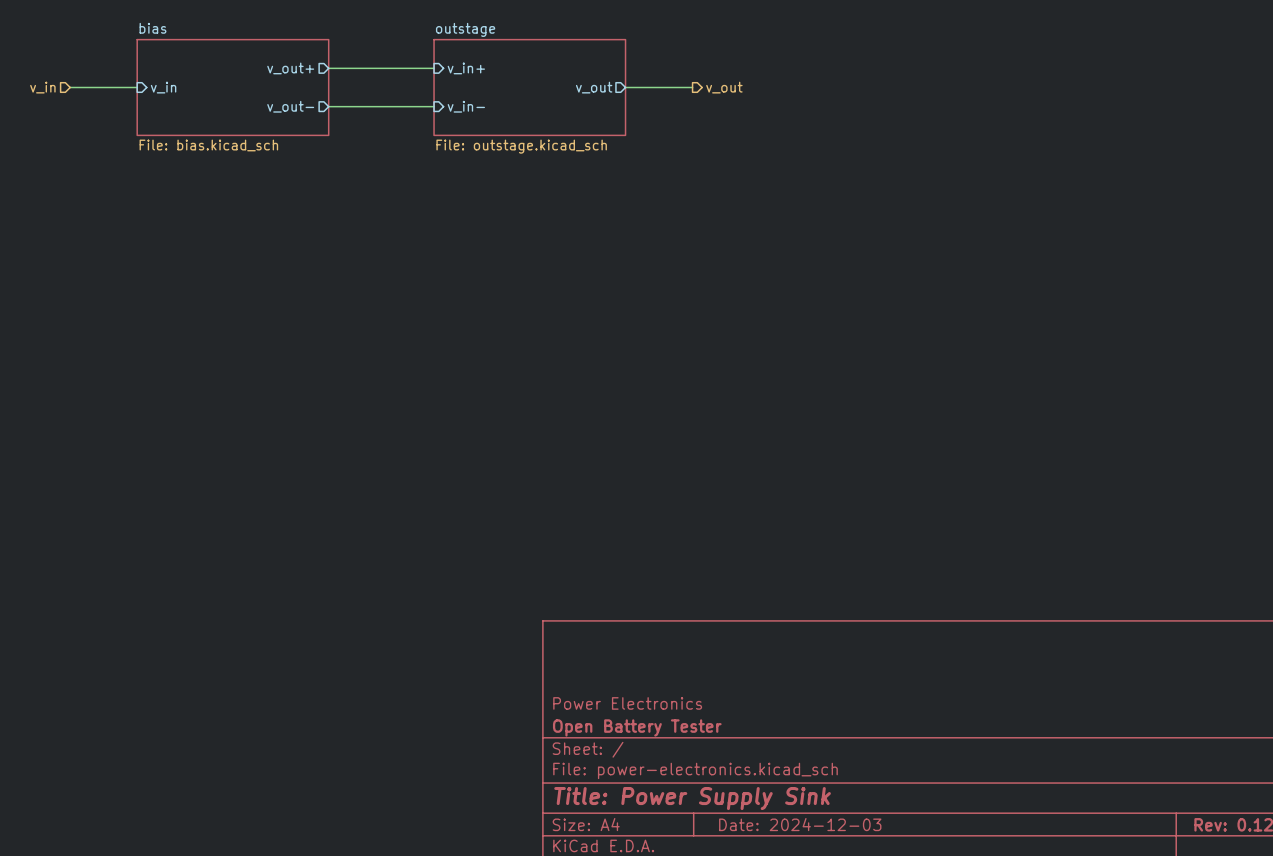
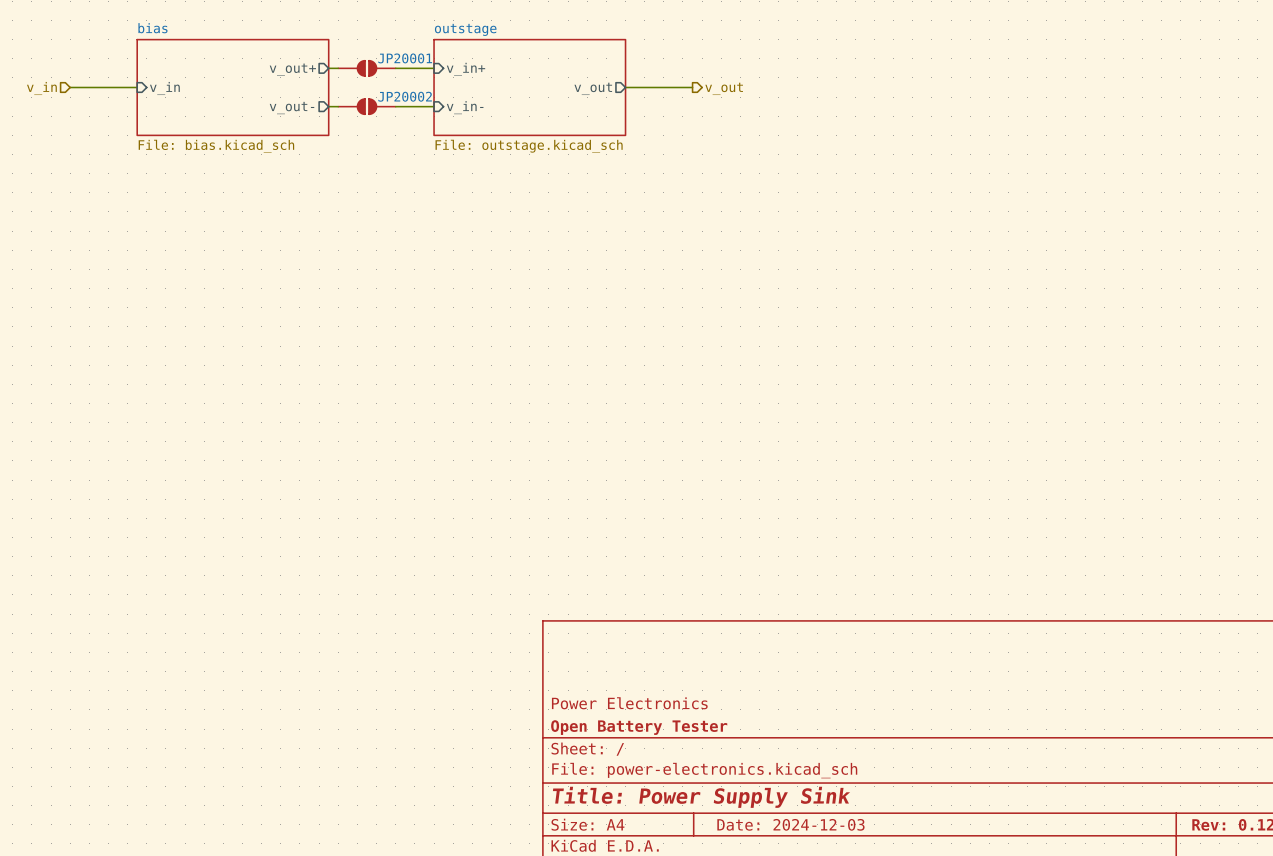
JP20001: none -> (367, 68)
JP20002: none -> (367, 106)

